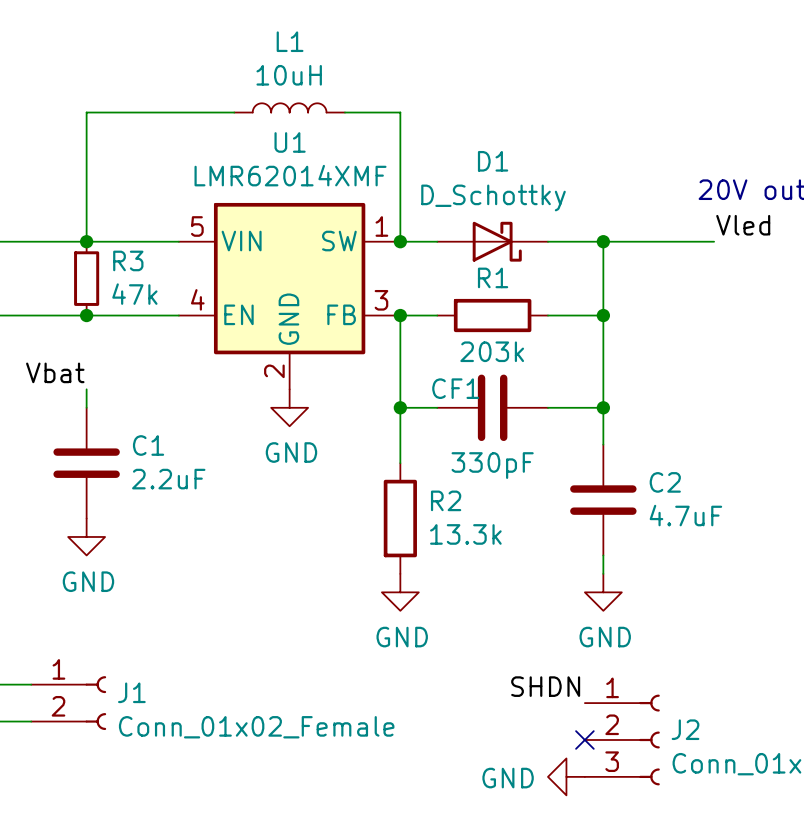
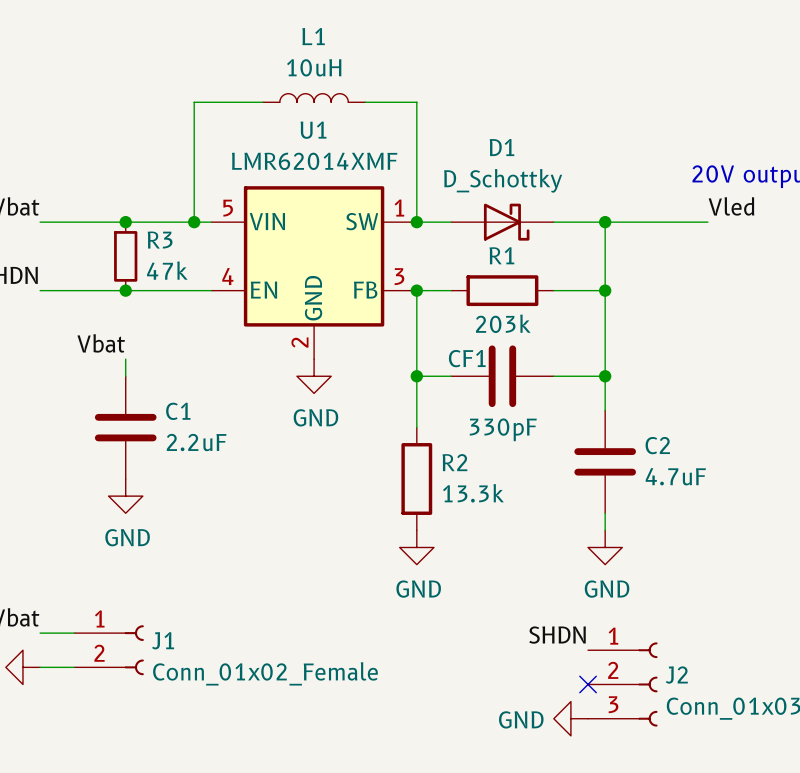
wire: (160, 112) (86, 112) (86, 241) -> (194, 102) (194, 222)
junction: none -> (194, 222)

